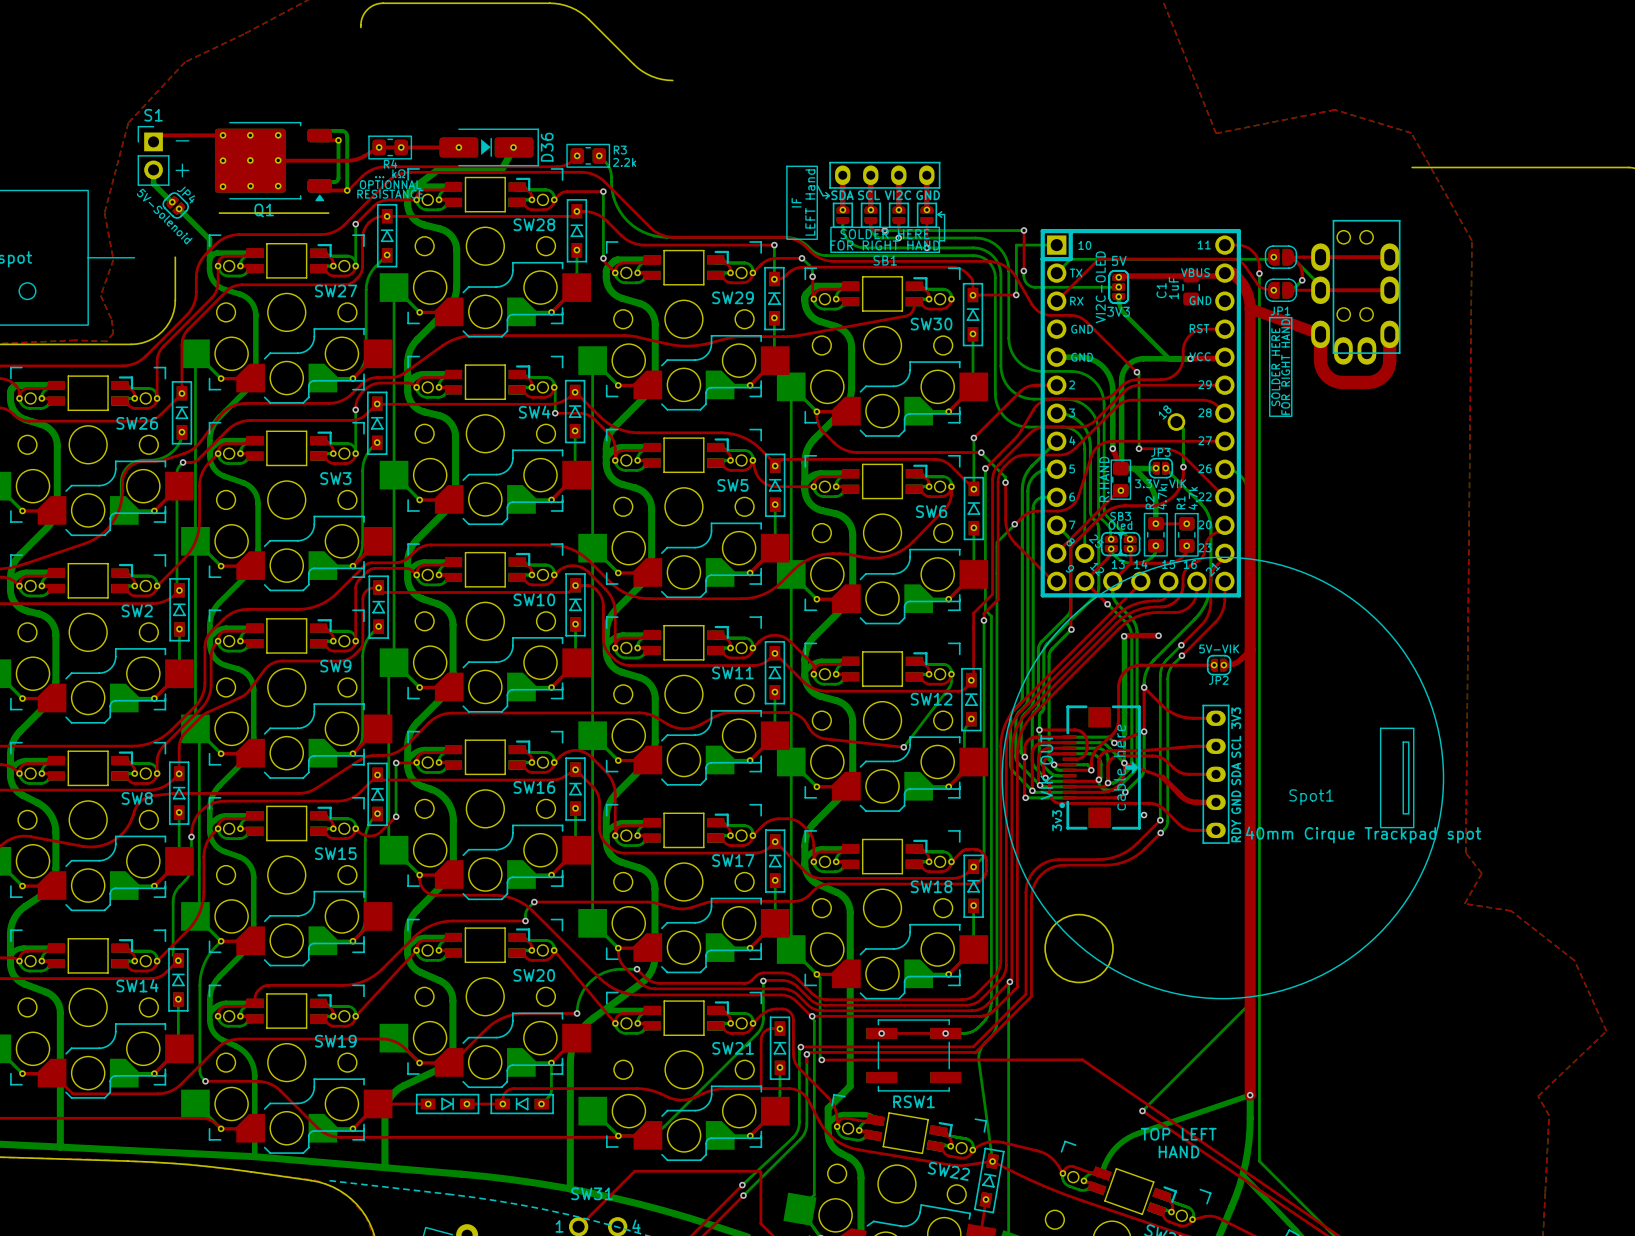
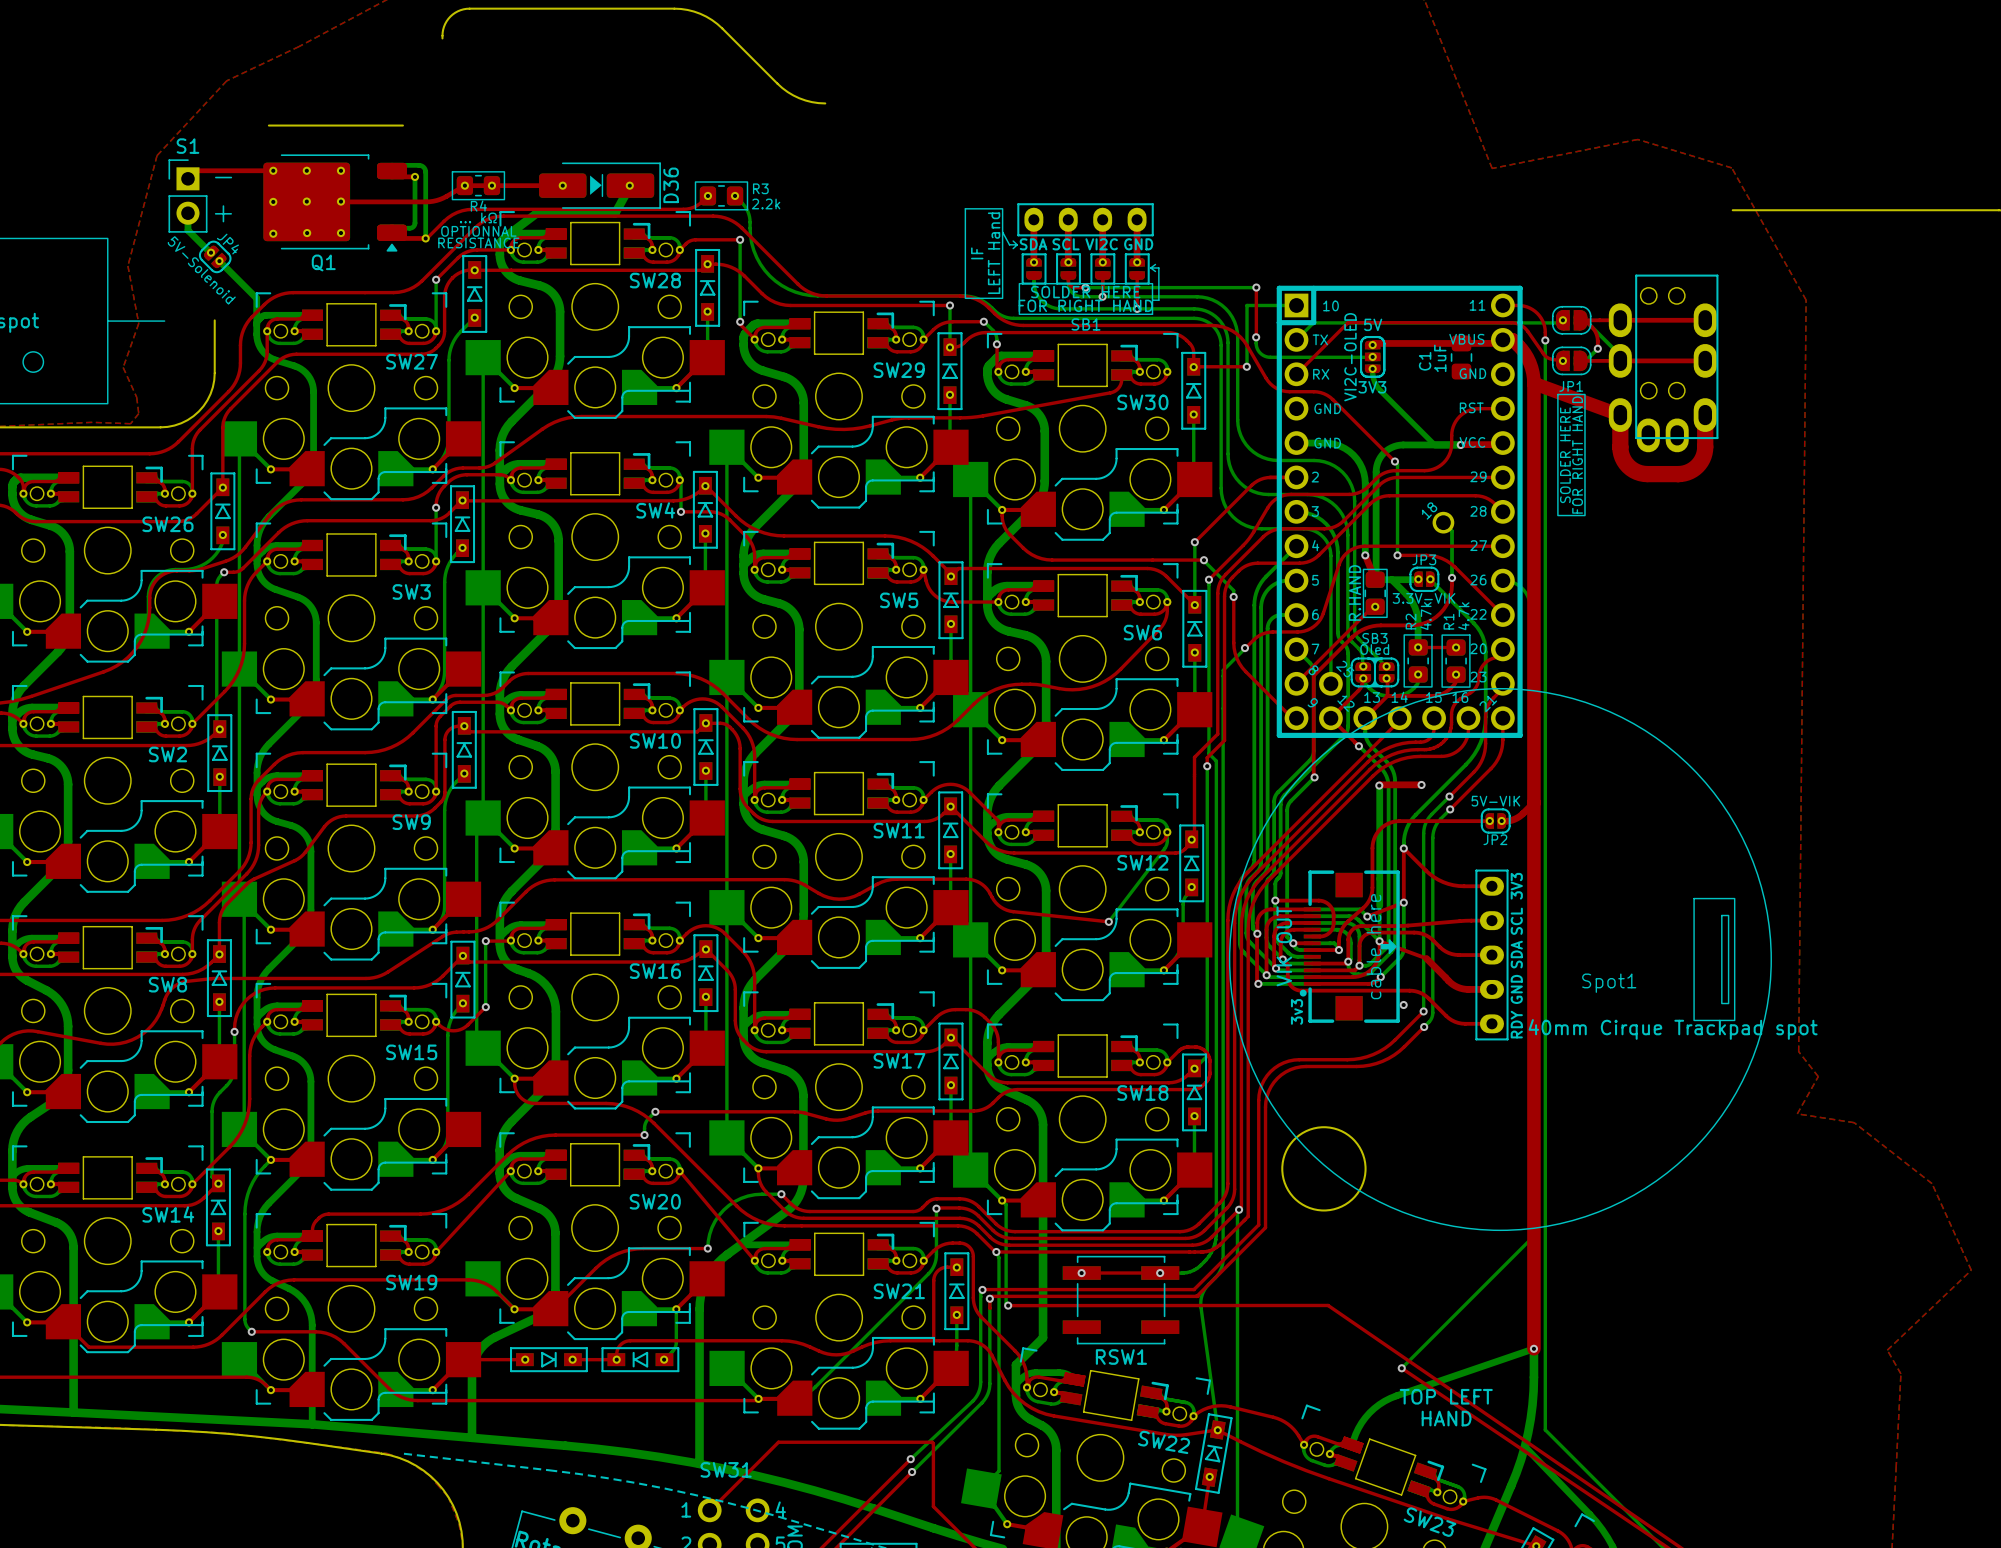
board edge: (219, 213) (328, 213) -> (268, 125) (402, 125)

